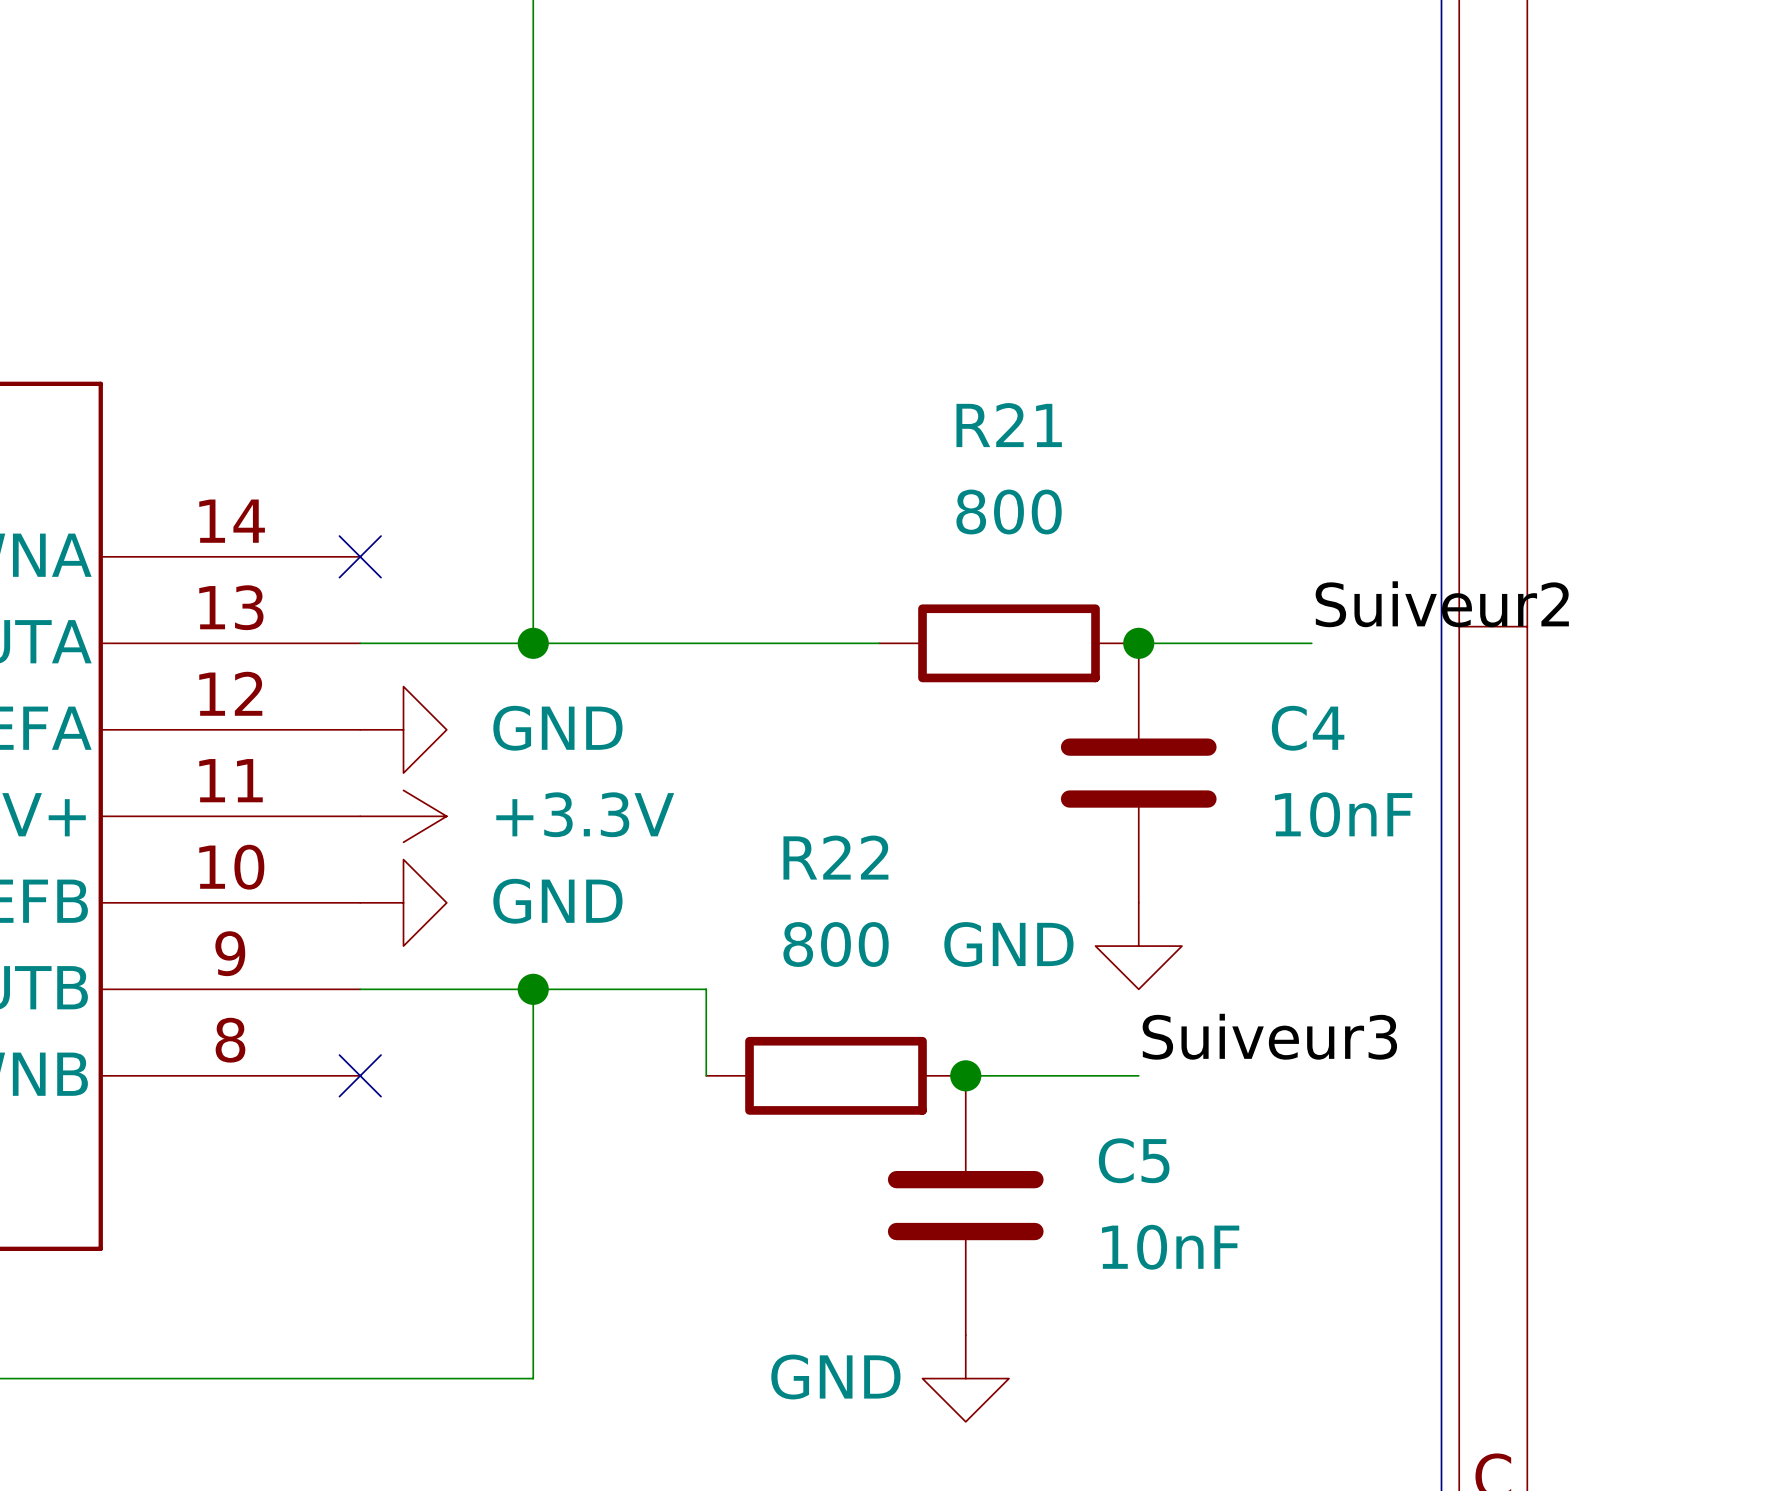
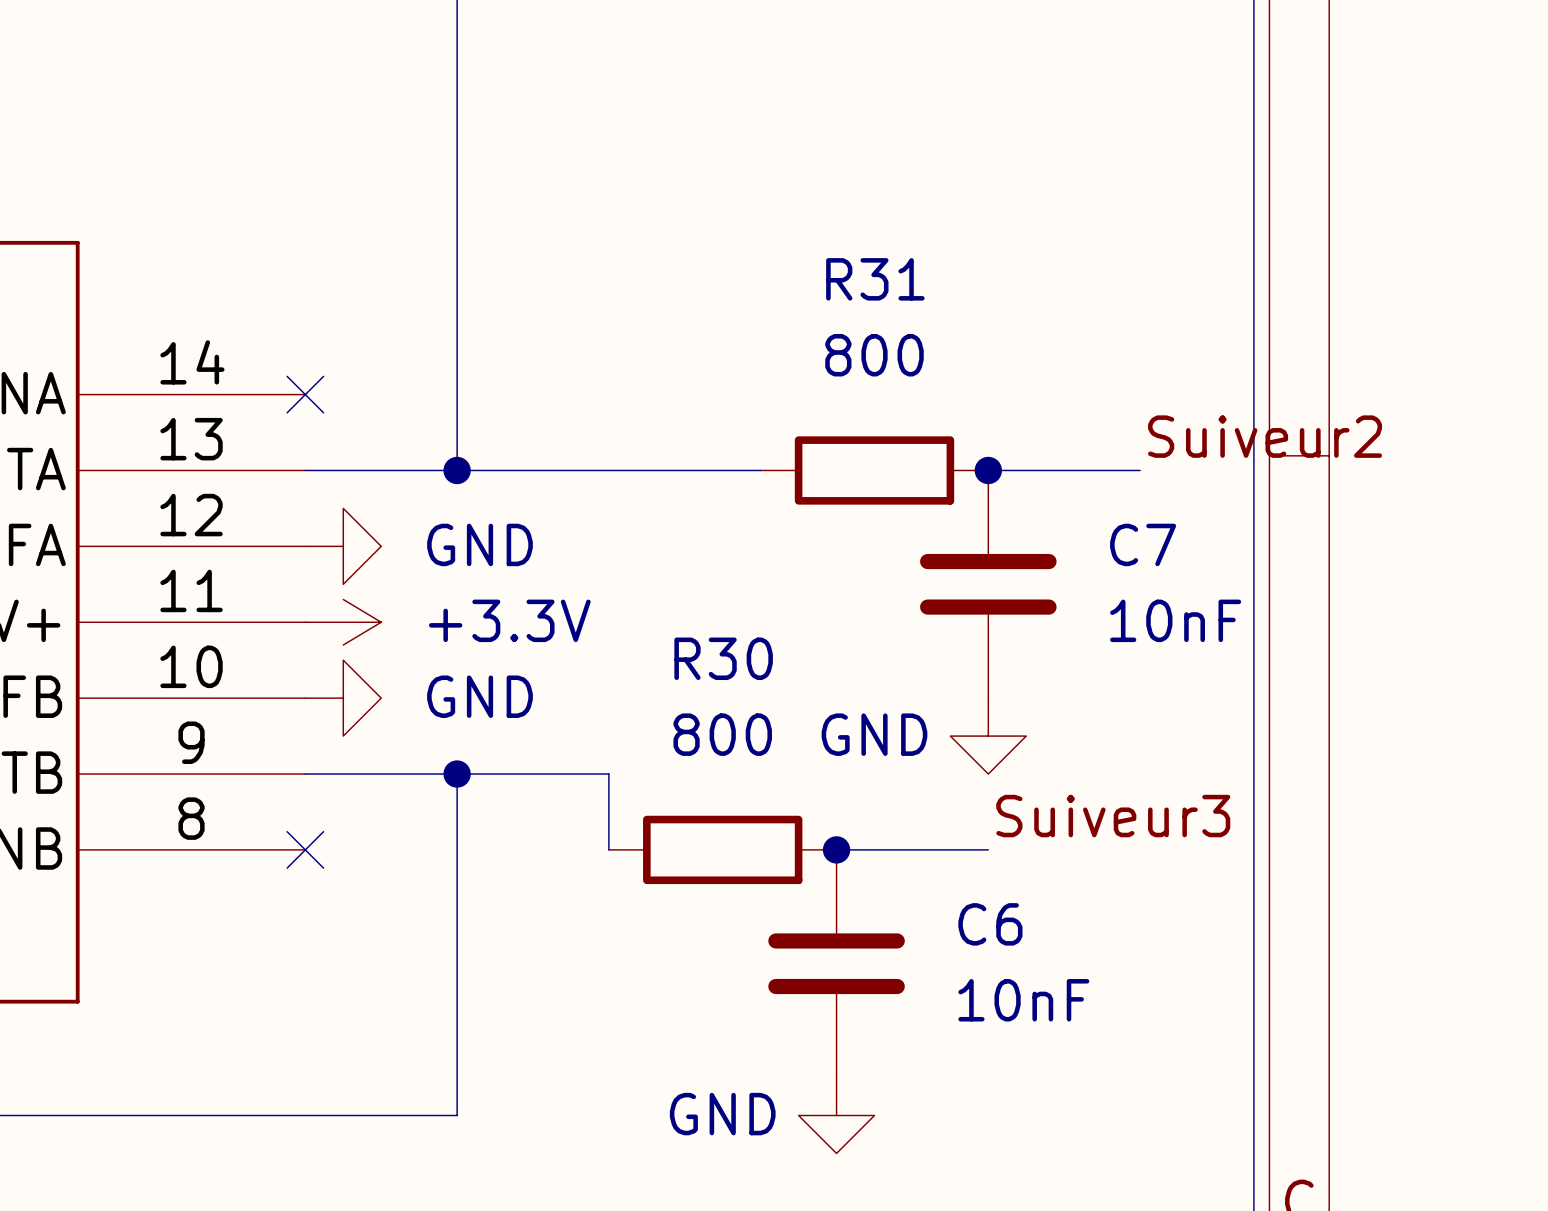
R21 name: R21 (1009, 425) -> R31 (875, 279)
C4 name: C4 (1308, 728) -> C7 (1143, 544)
R22 name: R22 (835, 857) -> R30 (723, 658)
C5 name: C5 (1134, 1160) -> C6 (990, 924)

